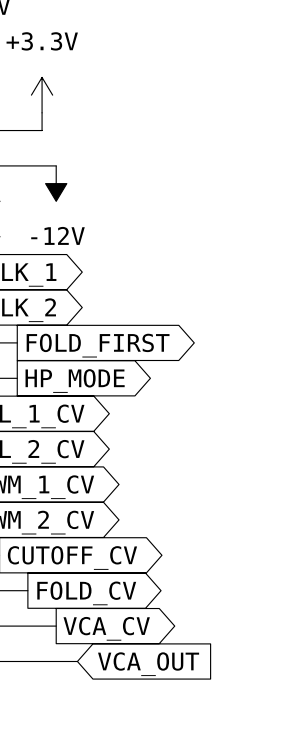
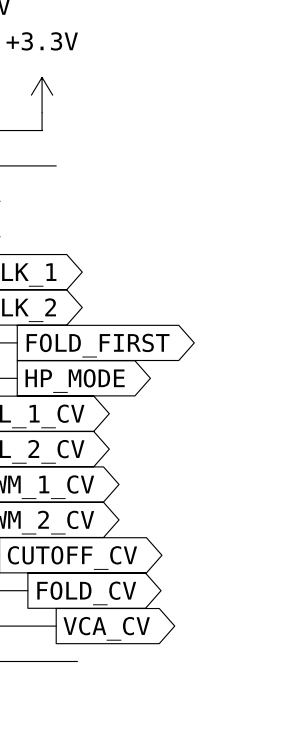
power symbol: -12V (56, 183) -> none
global label: VCA_OUT (148, 664) -> none

